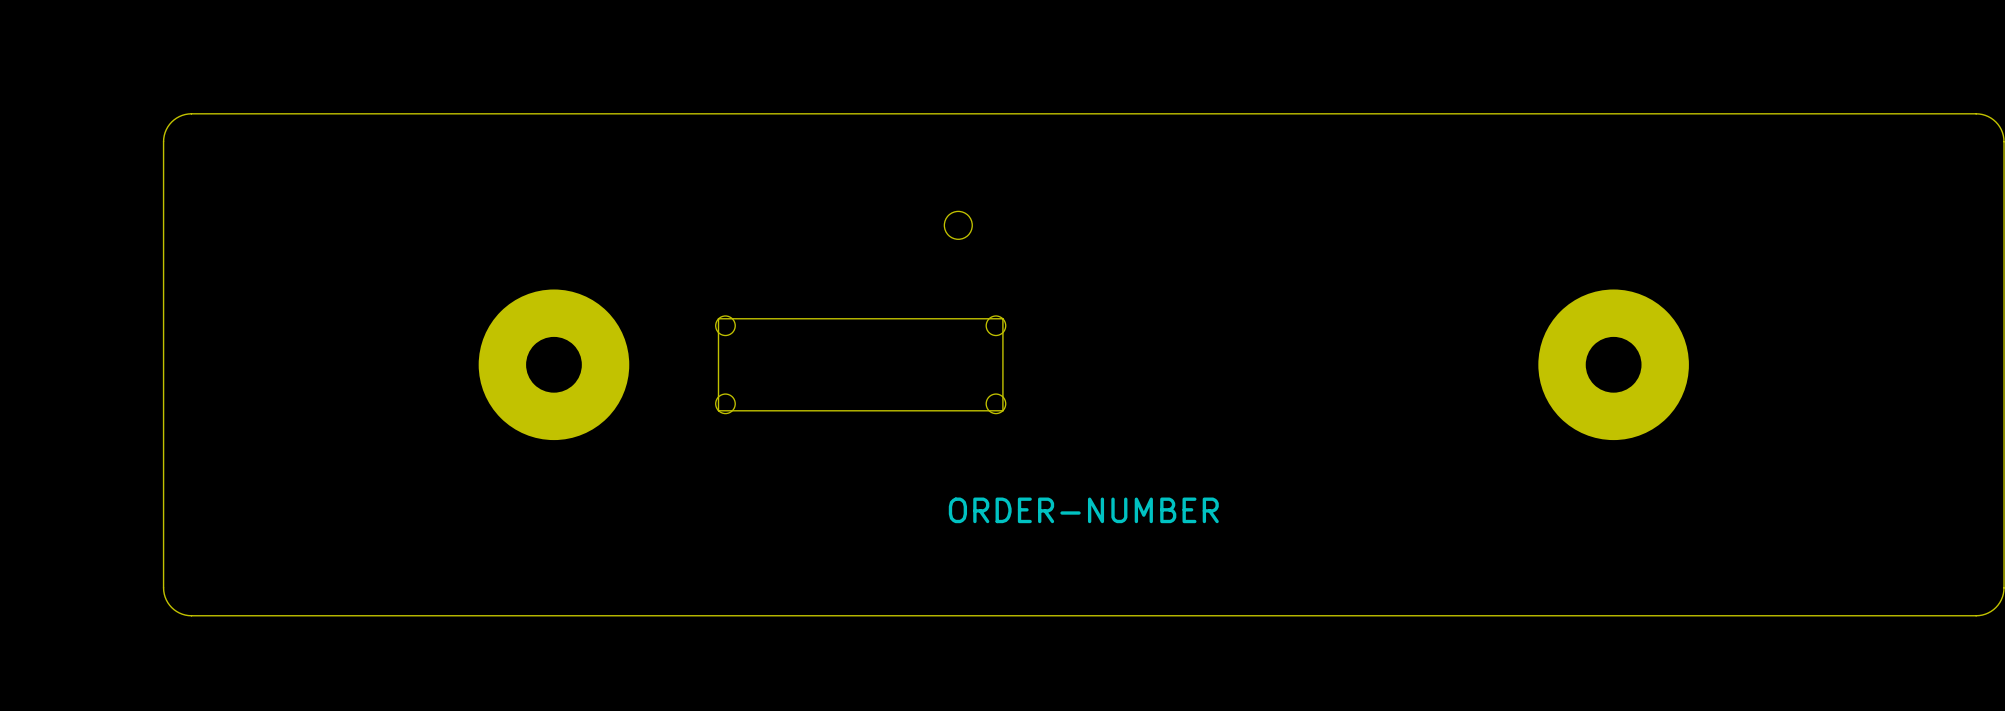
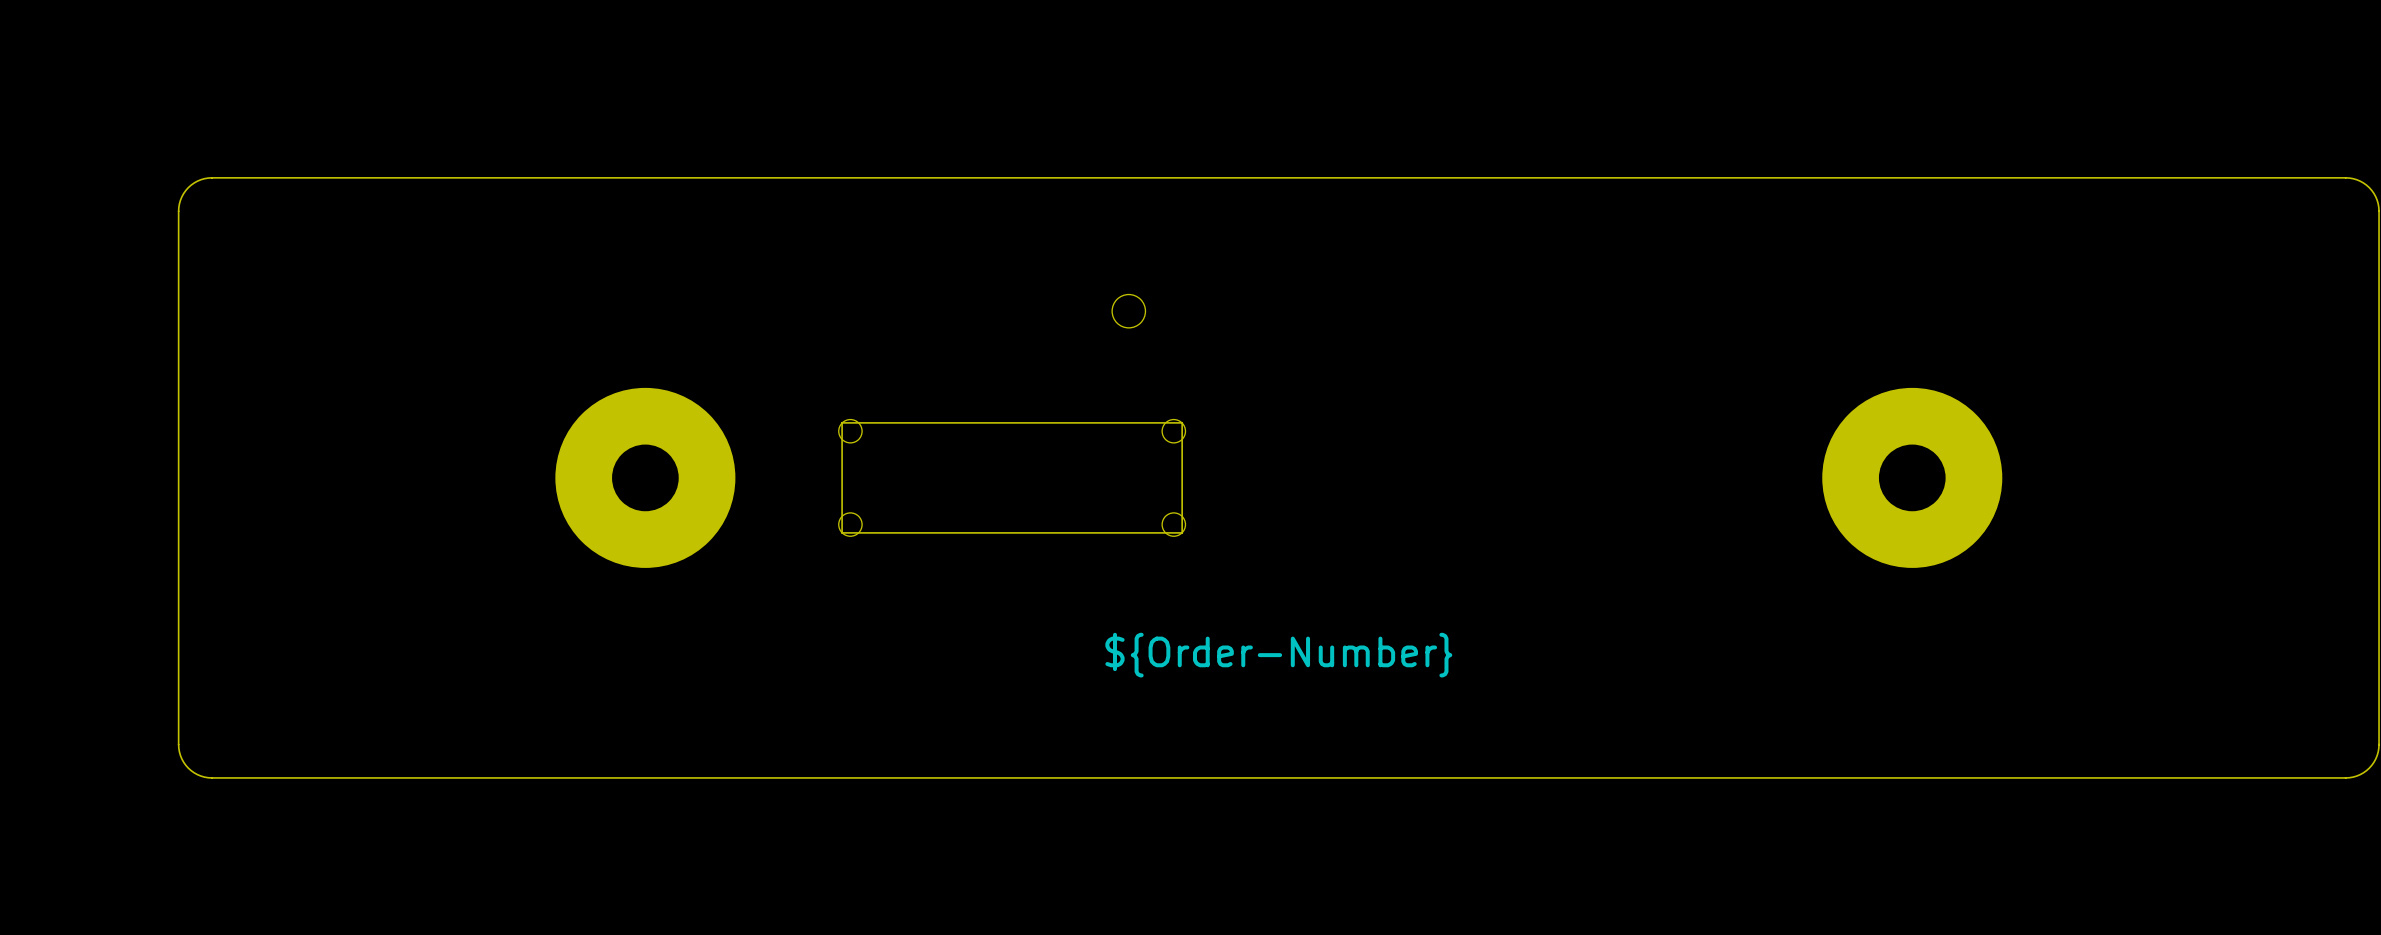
drawing shape: [948, 497, 1219, 524] -> [1105, 632, 1453, 678]

